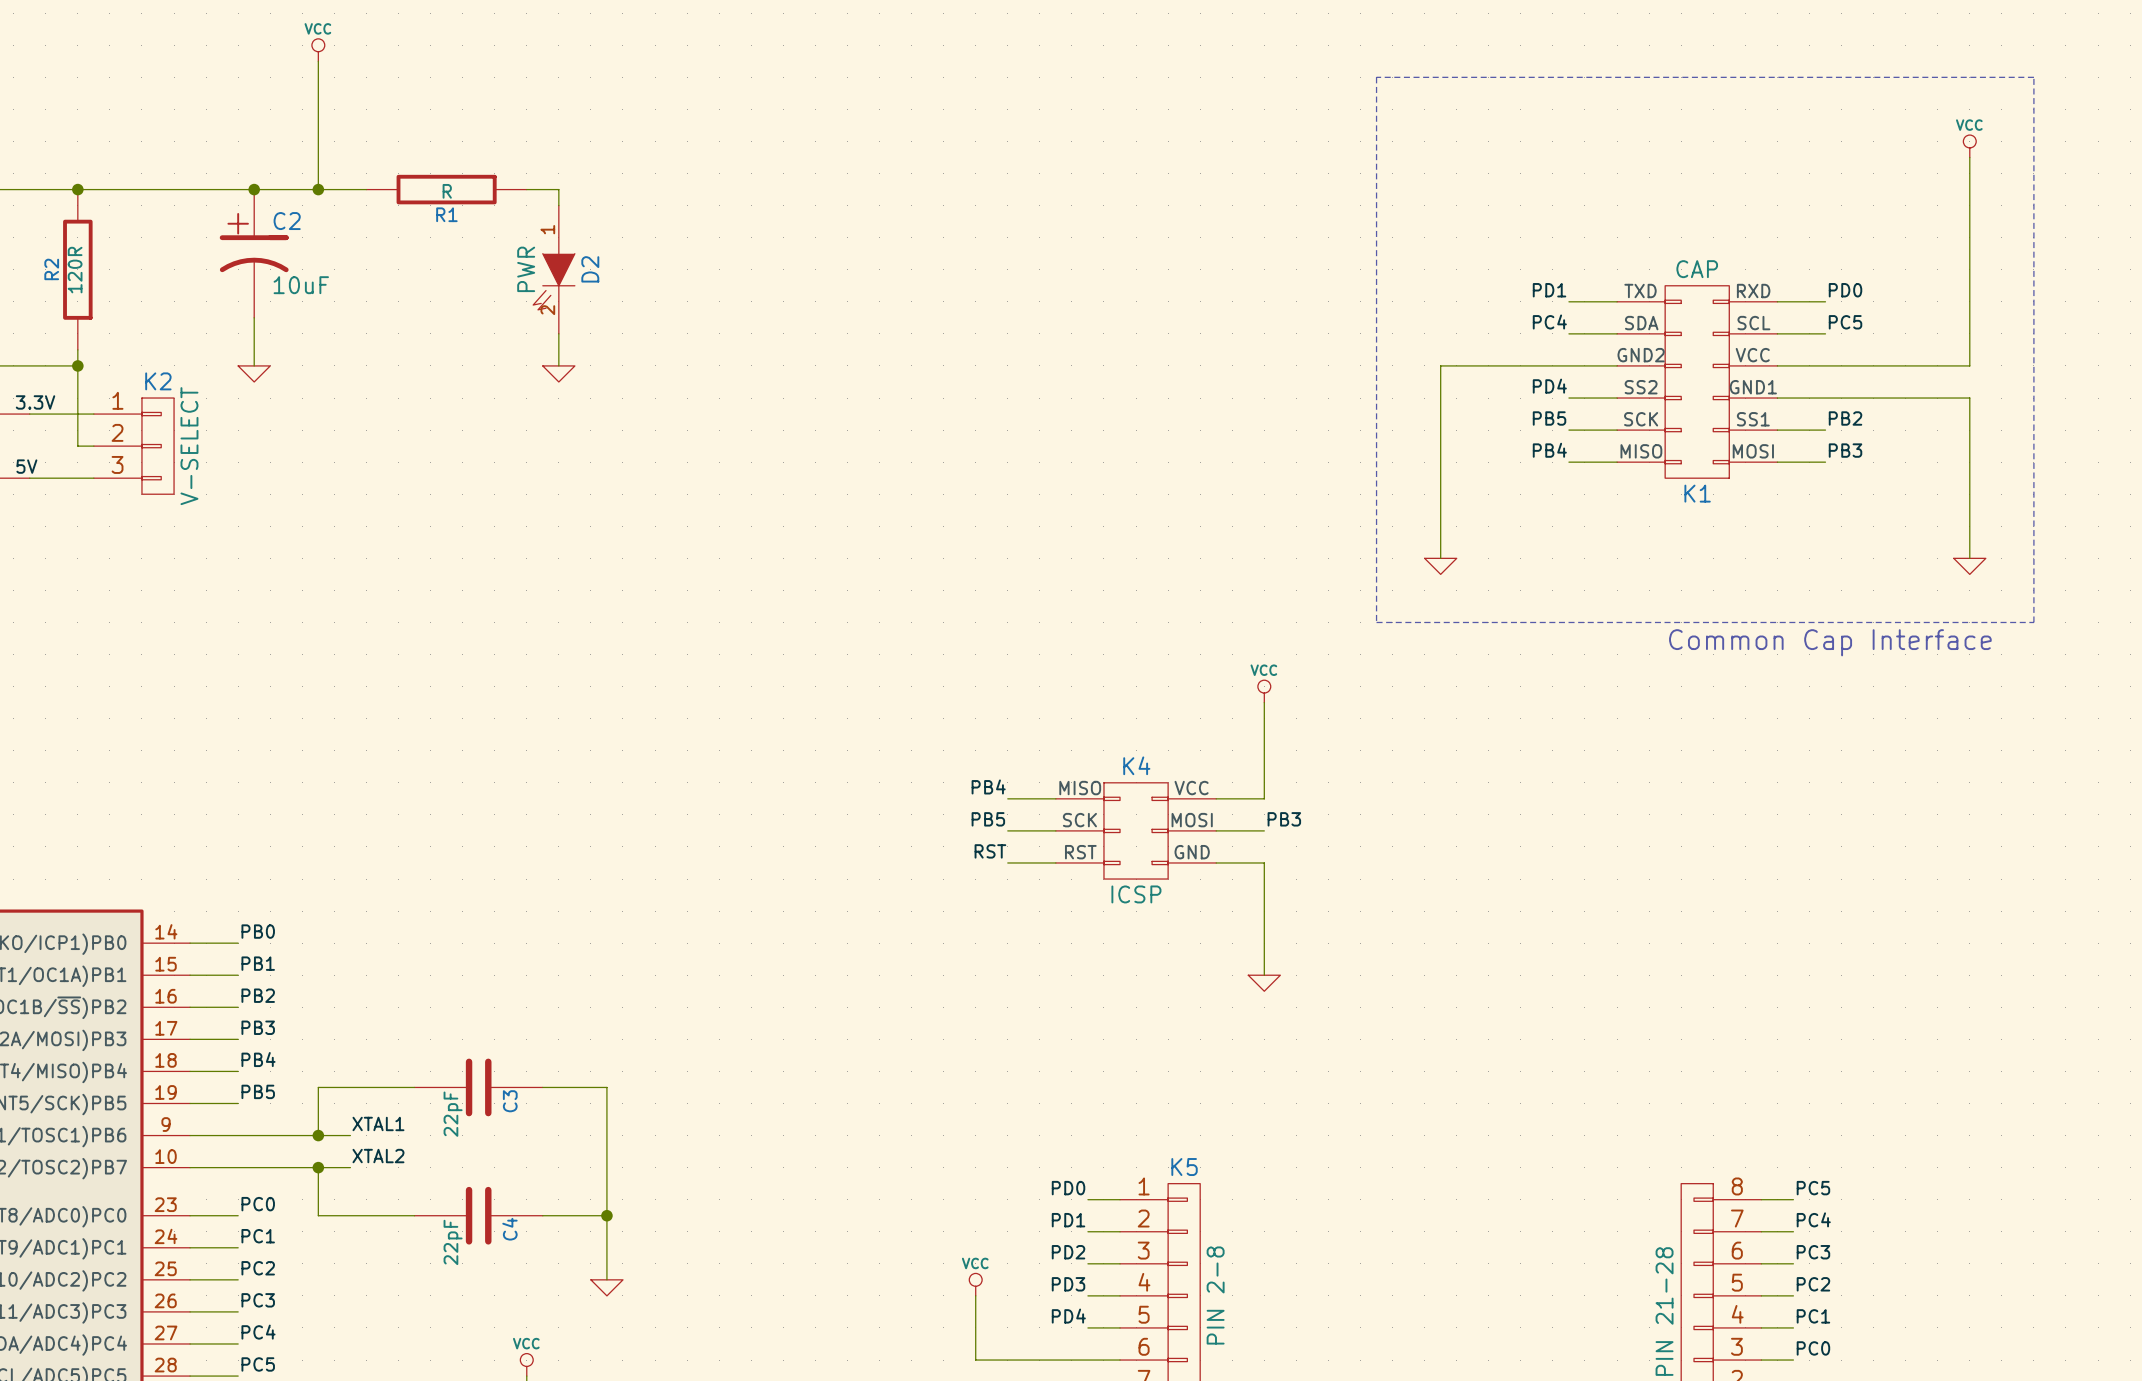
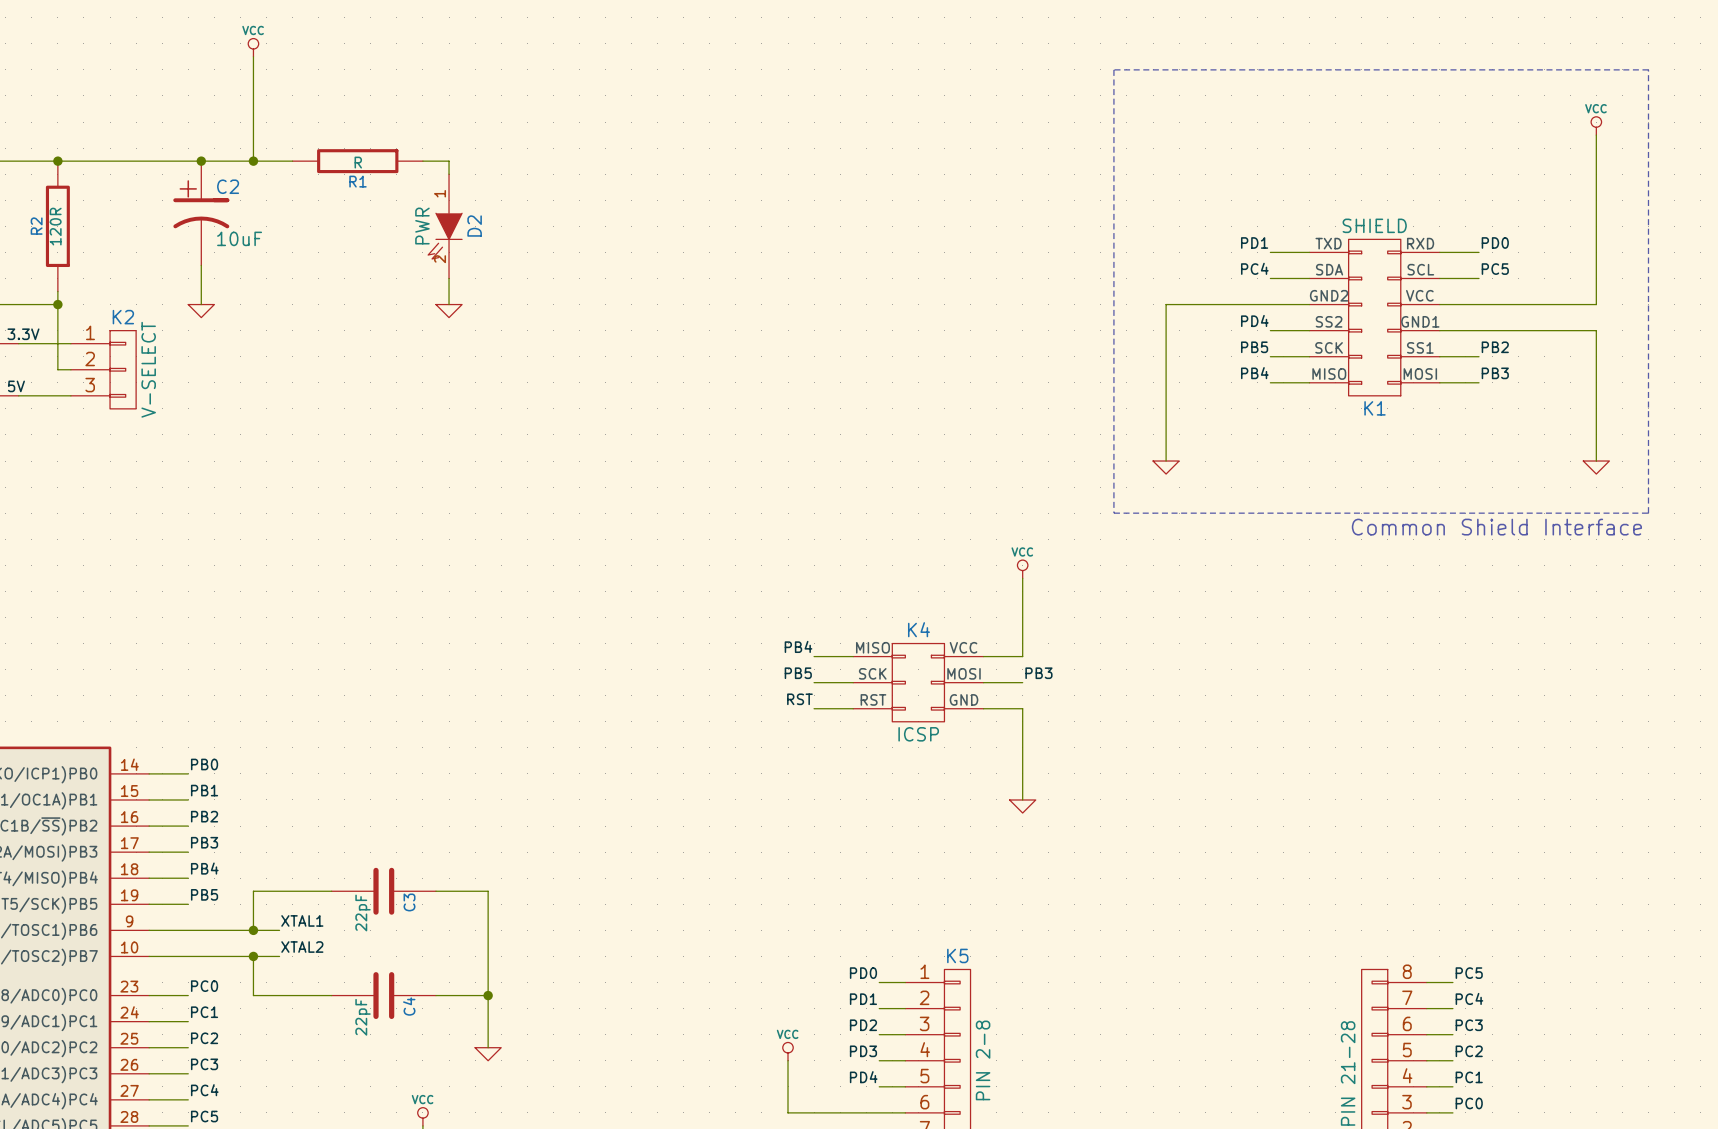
K1 value: CAP (1697, 269) -> SHIELD (1374, 225)
text: Common Cap Interface (1830, 642) -> Common Shield Interface (1496, 527)

